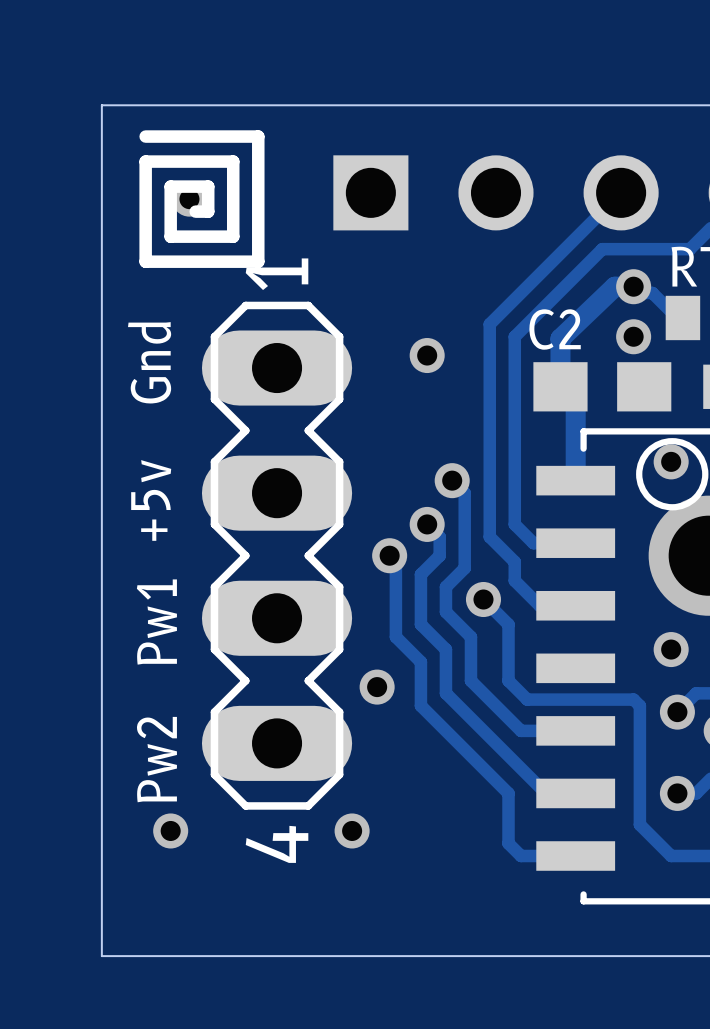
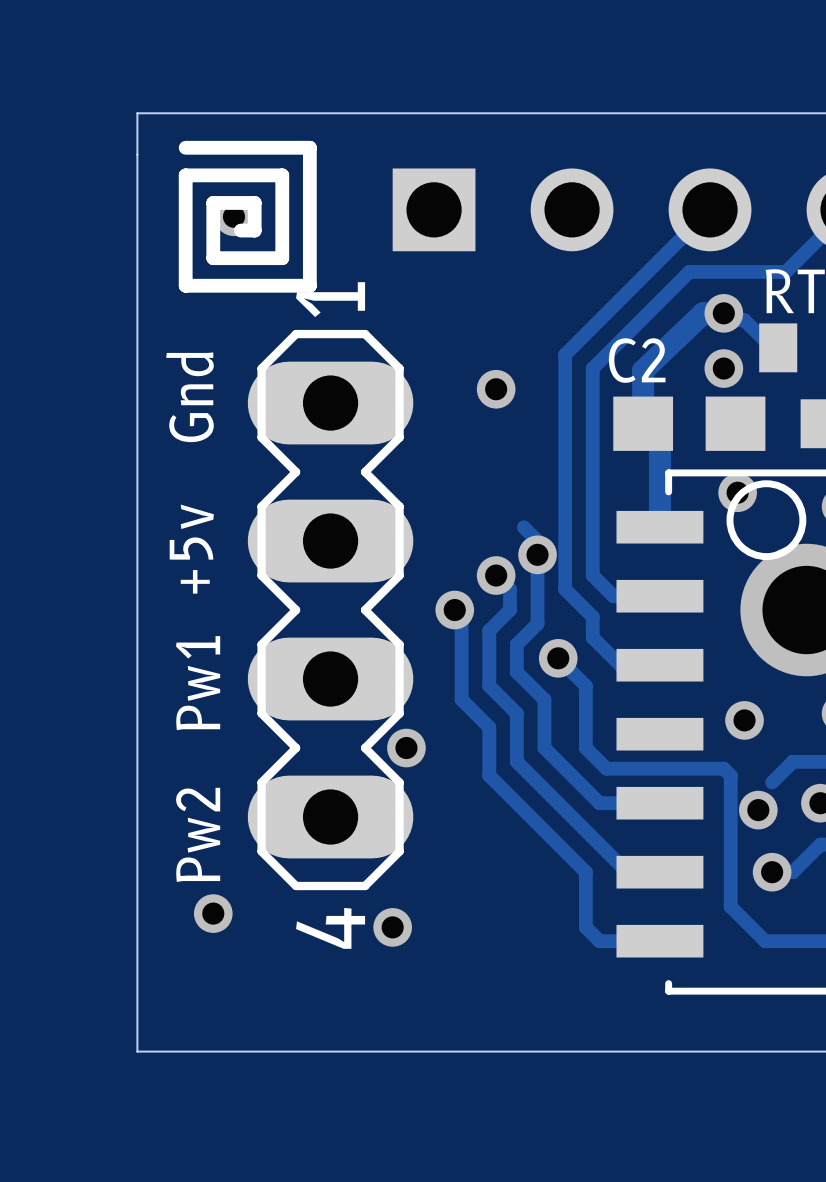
via position: (671, 461) -> (737, 492)
via position: (452, 480) -> (537, 554)
via position: (671, 649) -> (744, 720)
via position: (377, 687) -> (406, 748)
via position: (677, 712) -> (758, 810)
via position: (352, 830) -> (392, 927)

